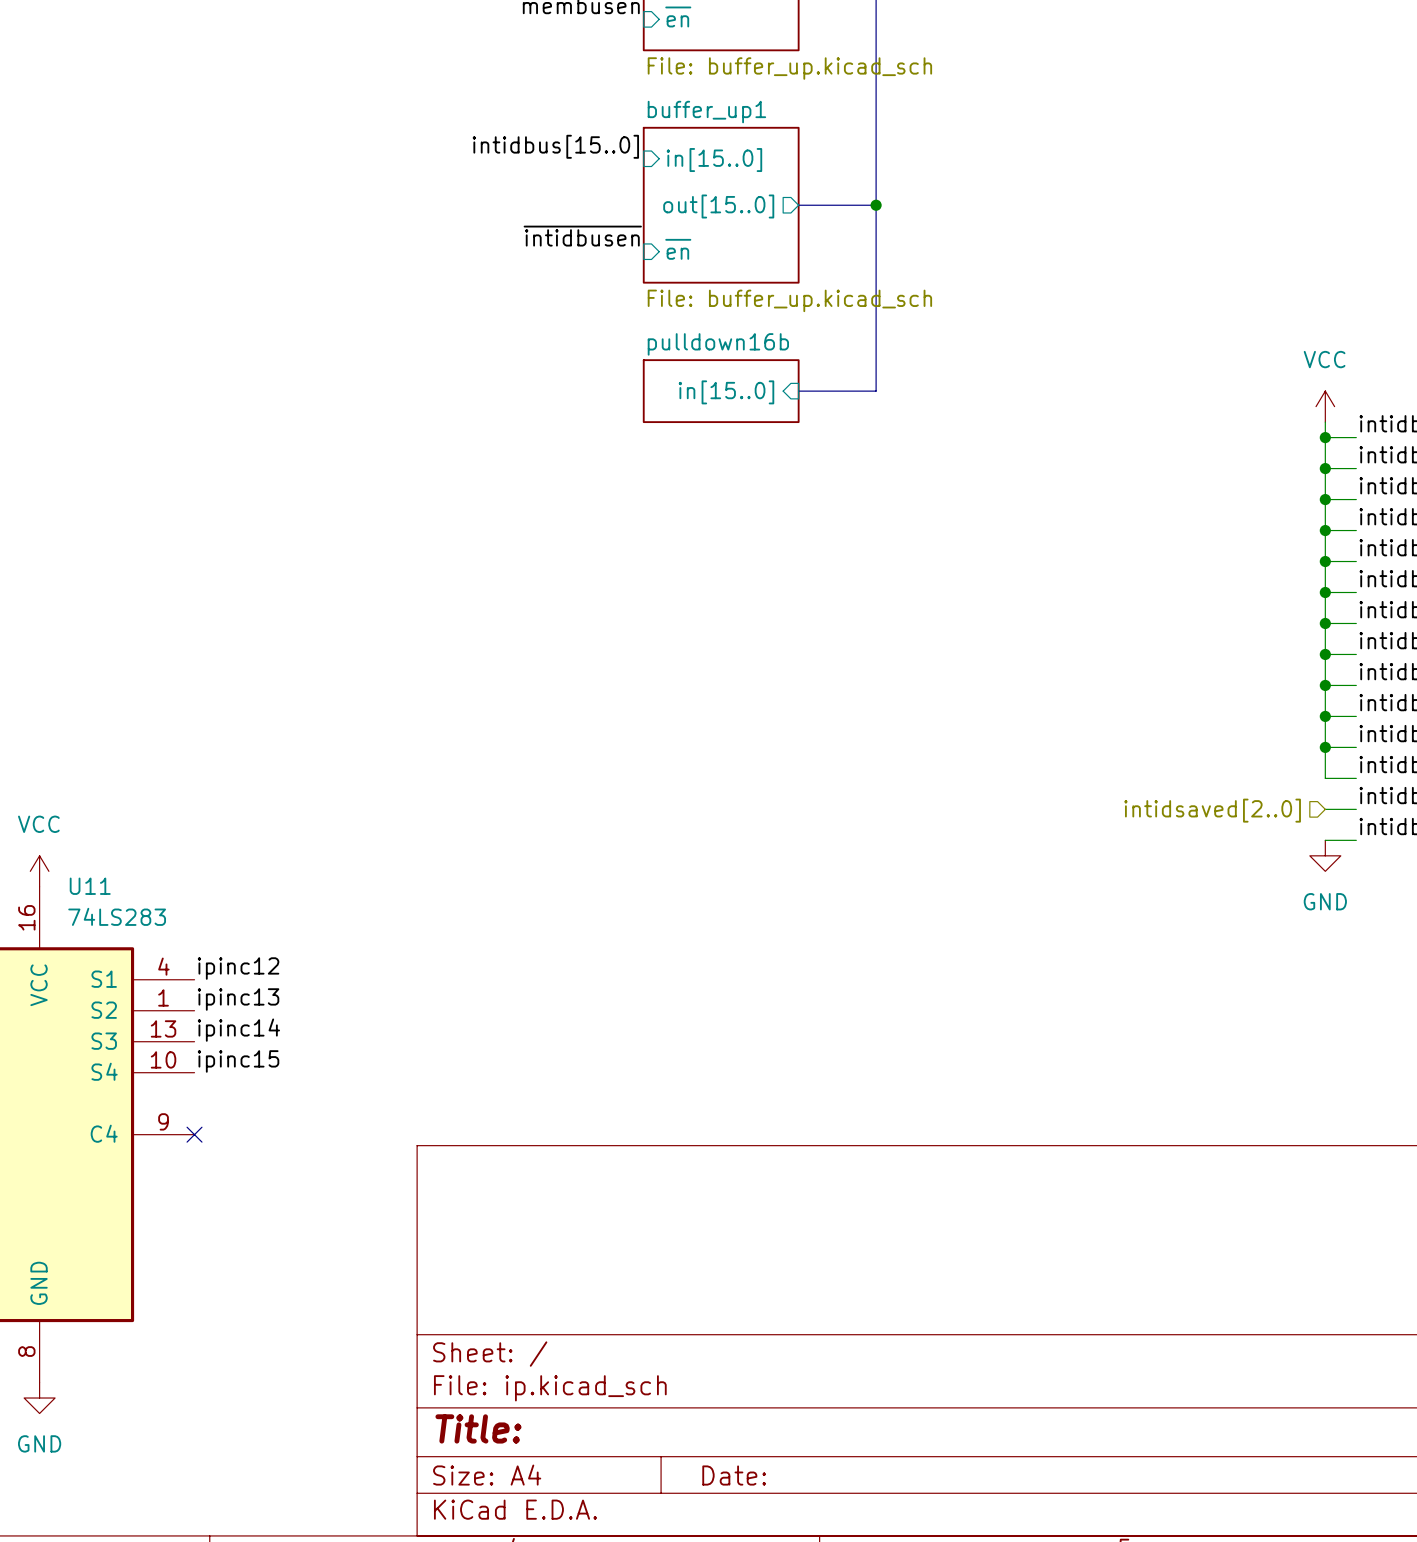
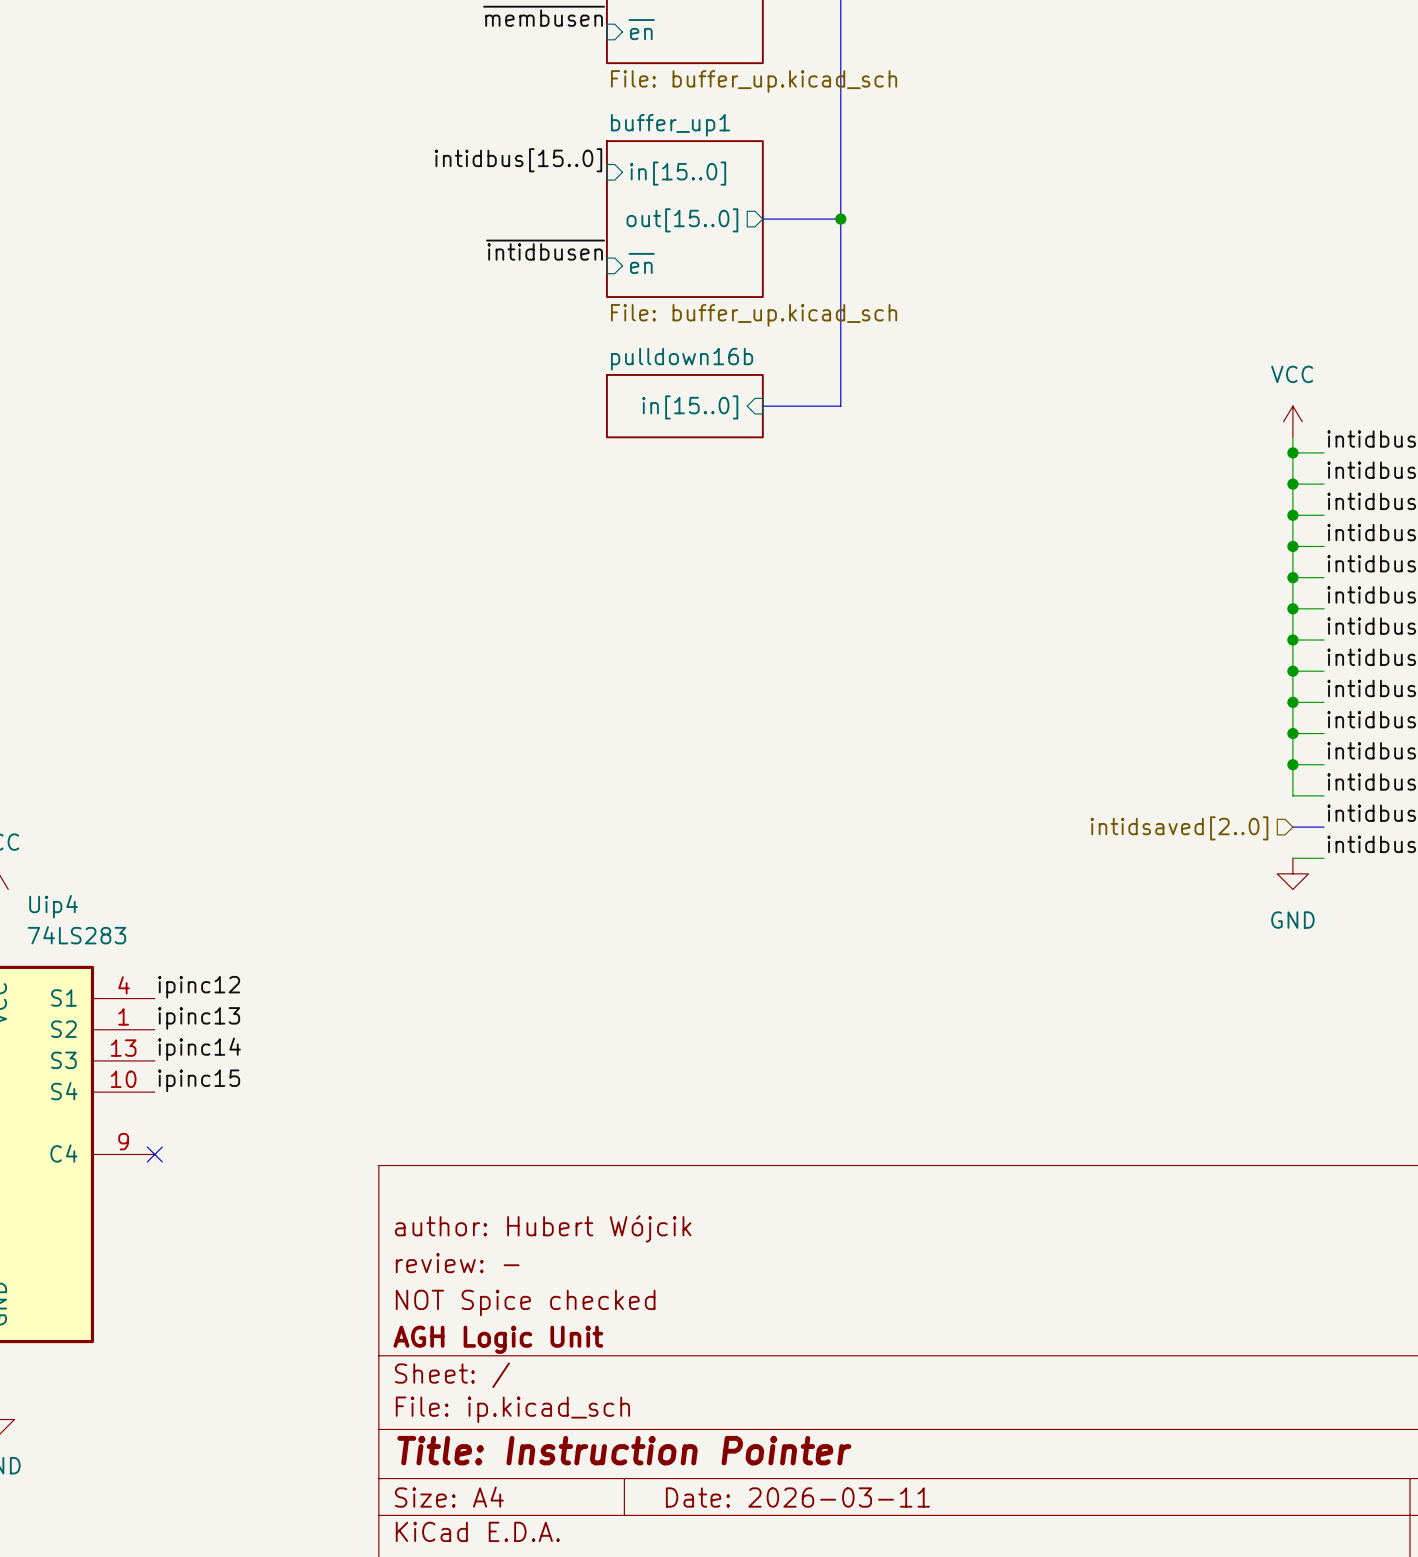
bus: none -> (1292, 827) (1324, 827)
U11 name: U11 (90, 886) -> Uip4 (53, 906)
title block: none -> author: Hubert Wójcik (543, 1228)
title block: none -> review: - (457, 1263)
title block: none -> NOT Spice checked (525, 1302)
title block: none -> AGH Logic Unit (498, 1339)
title block: Title: (478, 1428) -> Title: Instruction Pointer (624, 1450)
title block: Date: (734, 1475) -> Date: 2026-03-11 (797, 1497)

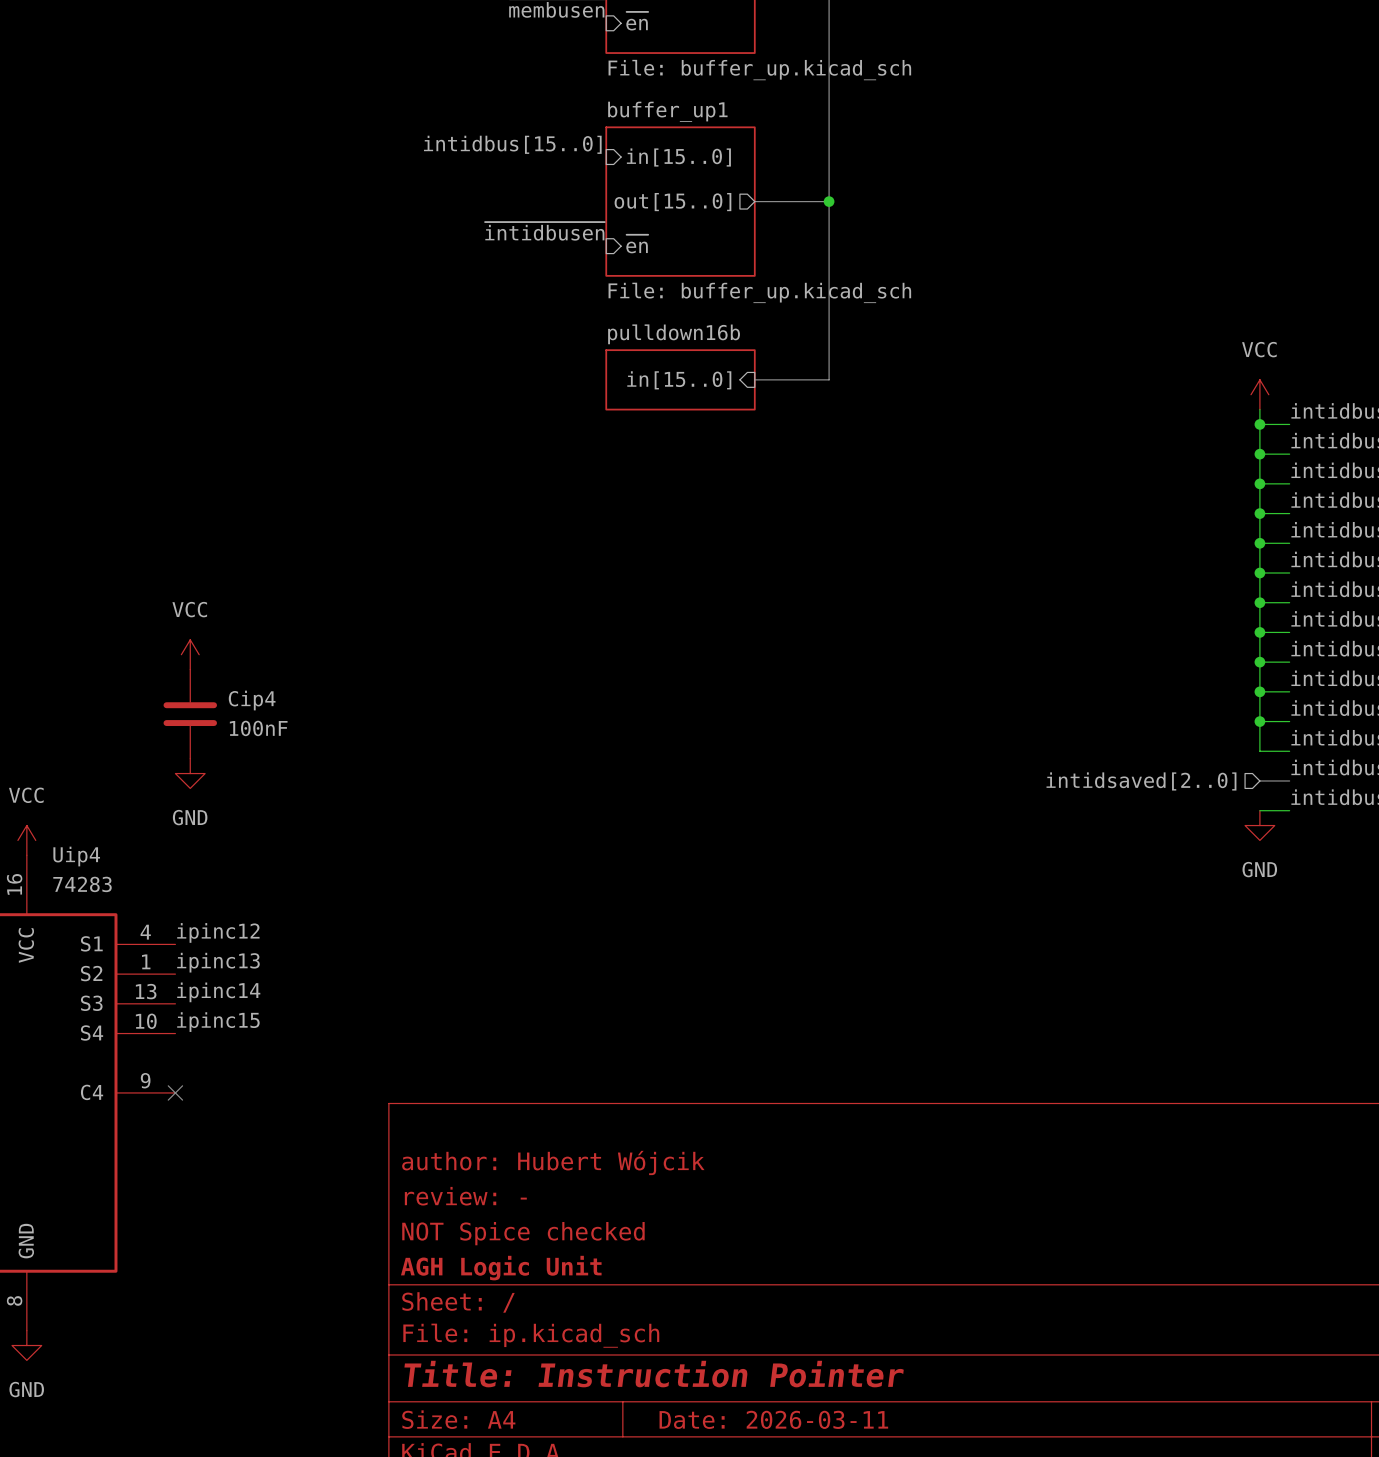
power symbol: none -> VCC (190, 654)
Cip4: none -> 100nF (190, 714)
power symbol: none -> GND (190, 773)
Uip4 value: 74LS283 (76, 935) -> 74283 (82, 884)

